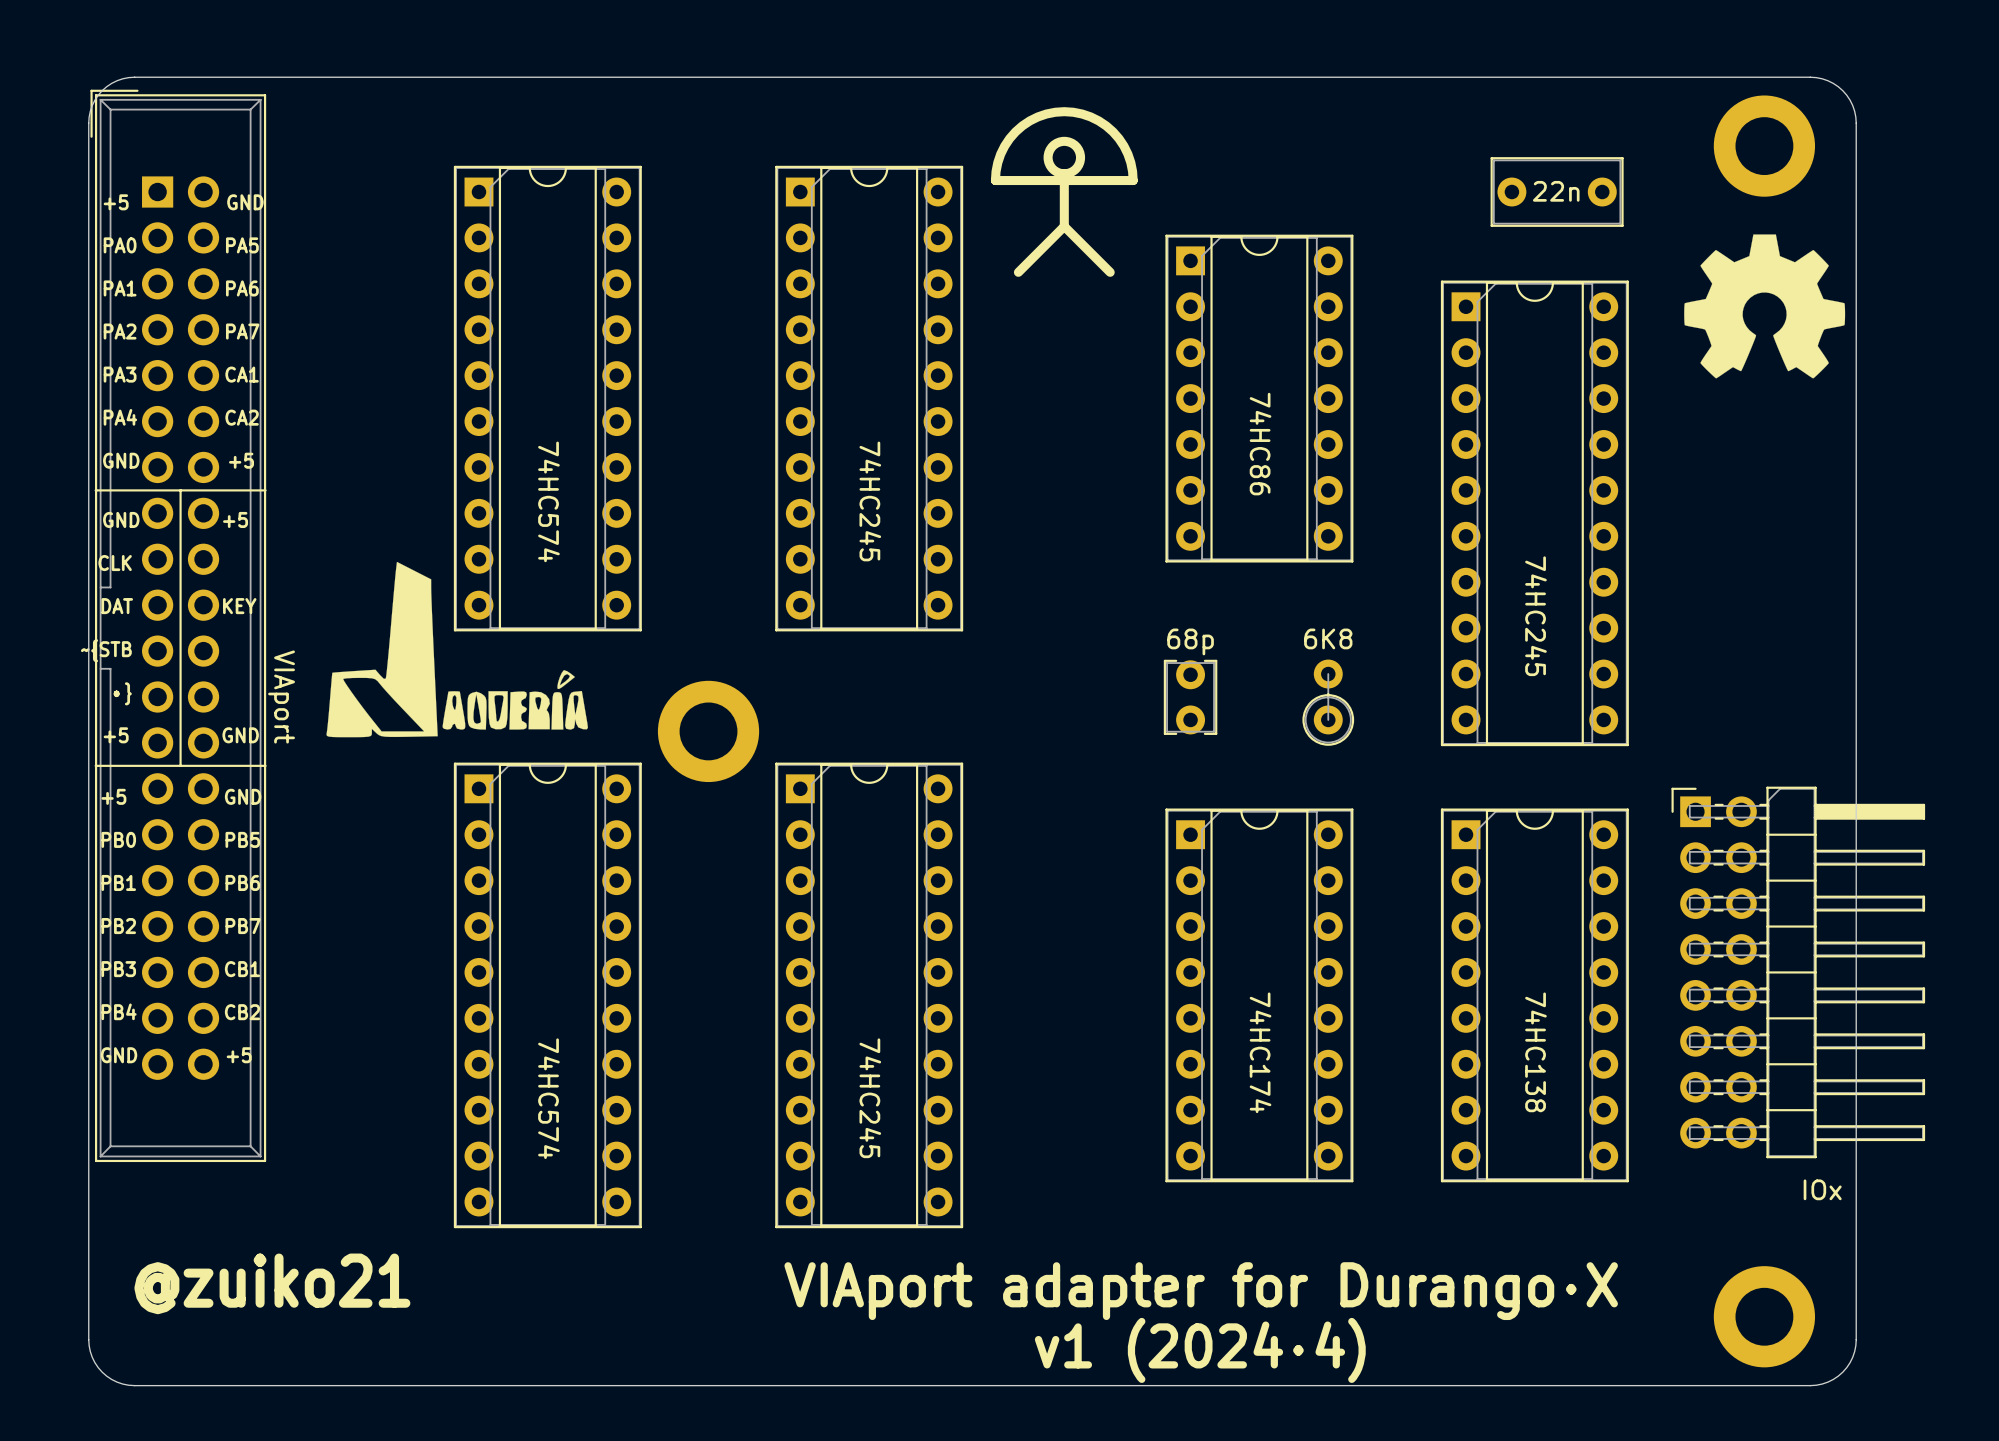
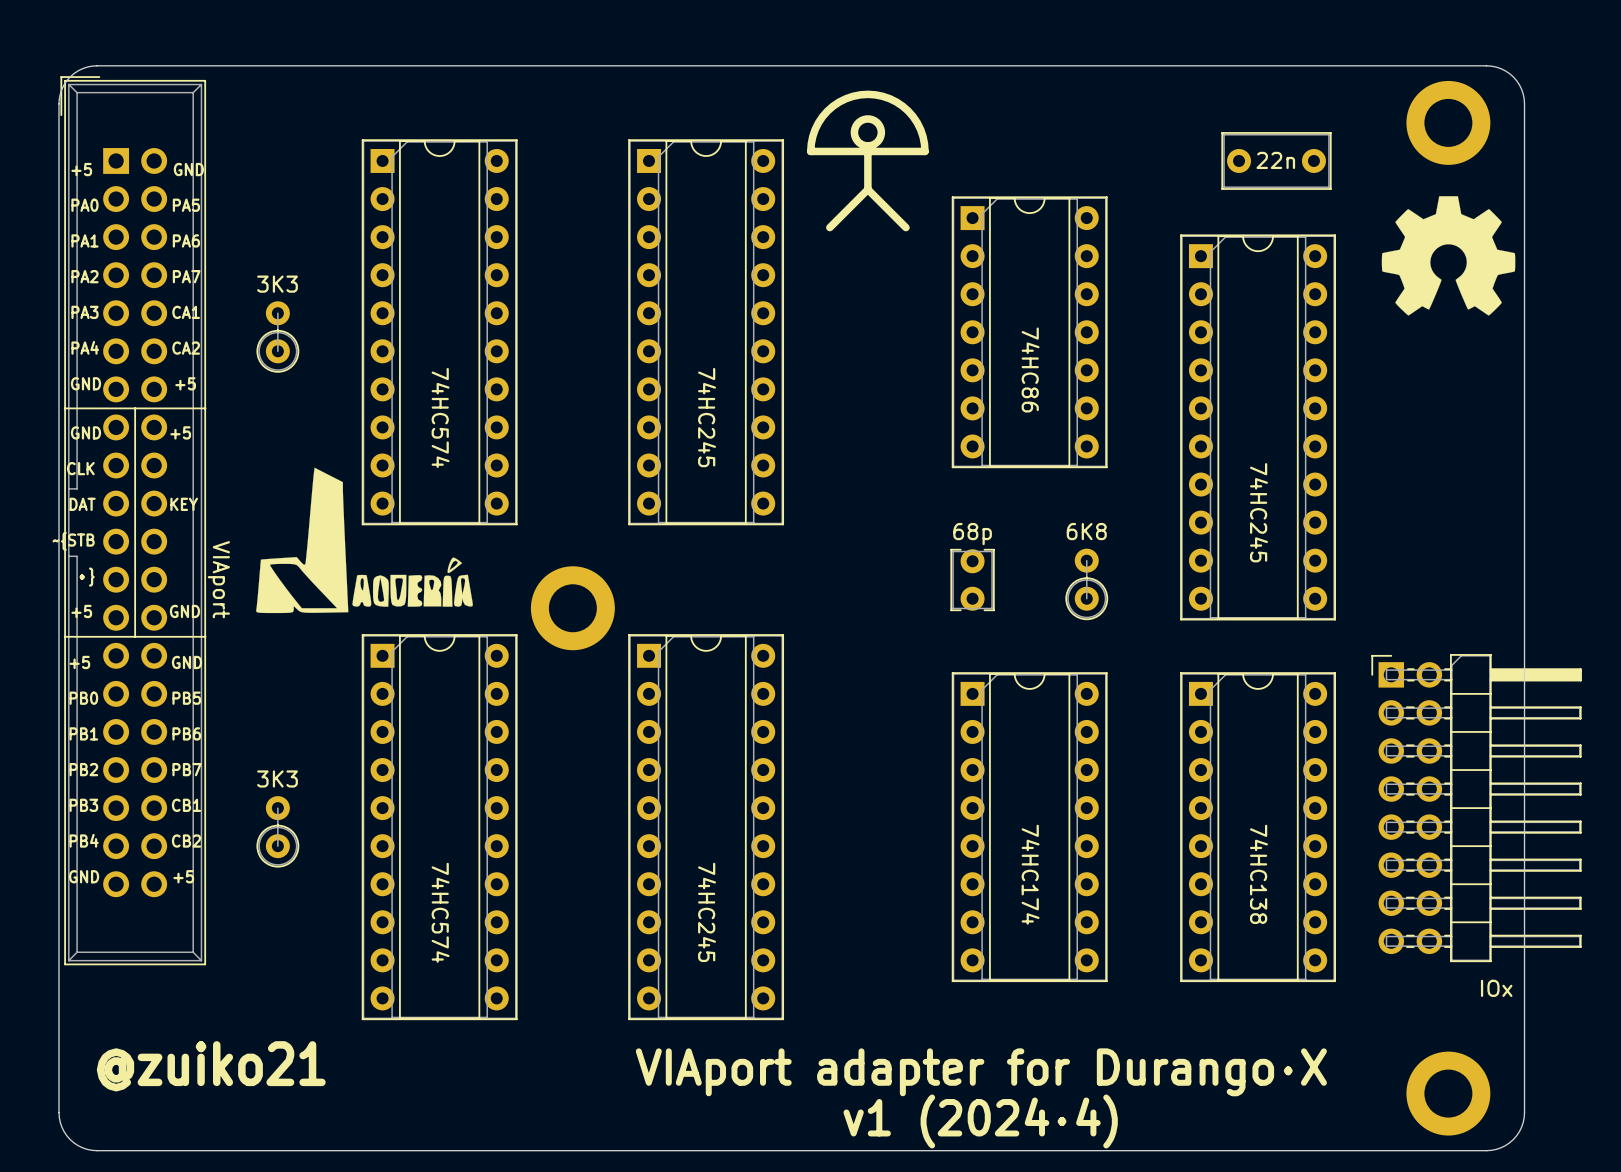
part: none -> 3K3 (277, 336)
part: none -> 3K3 (277, 831)

